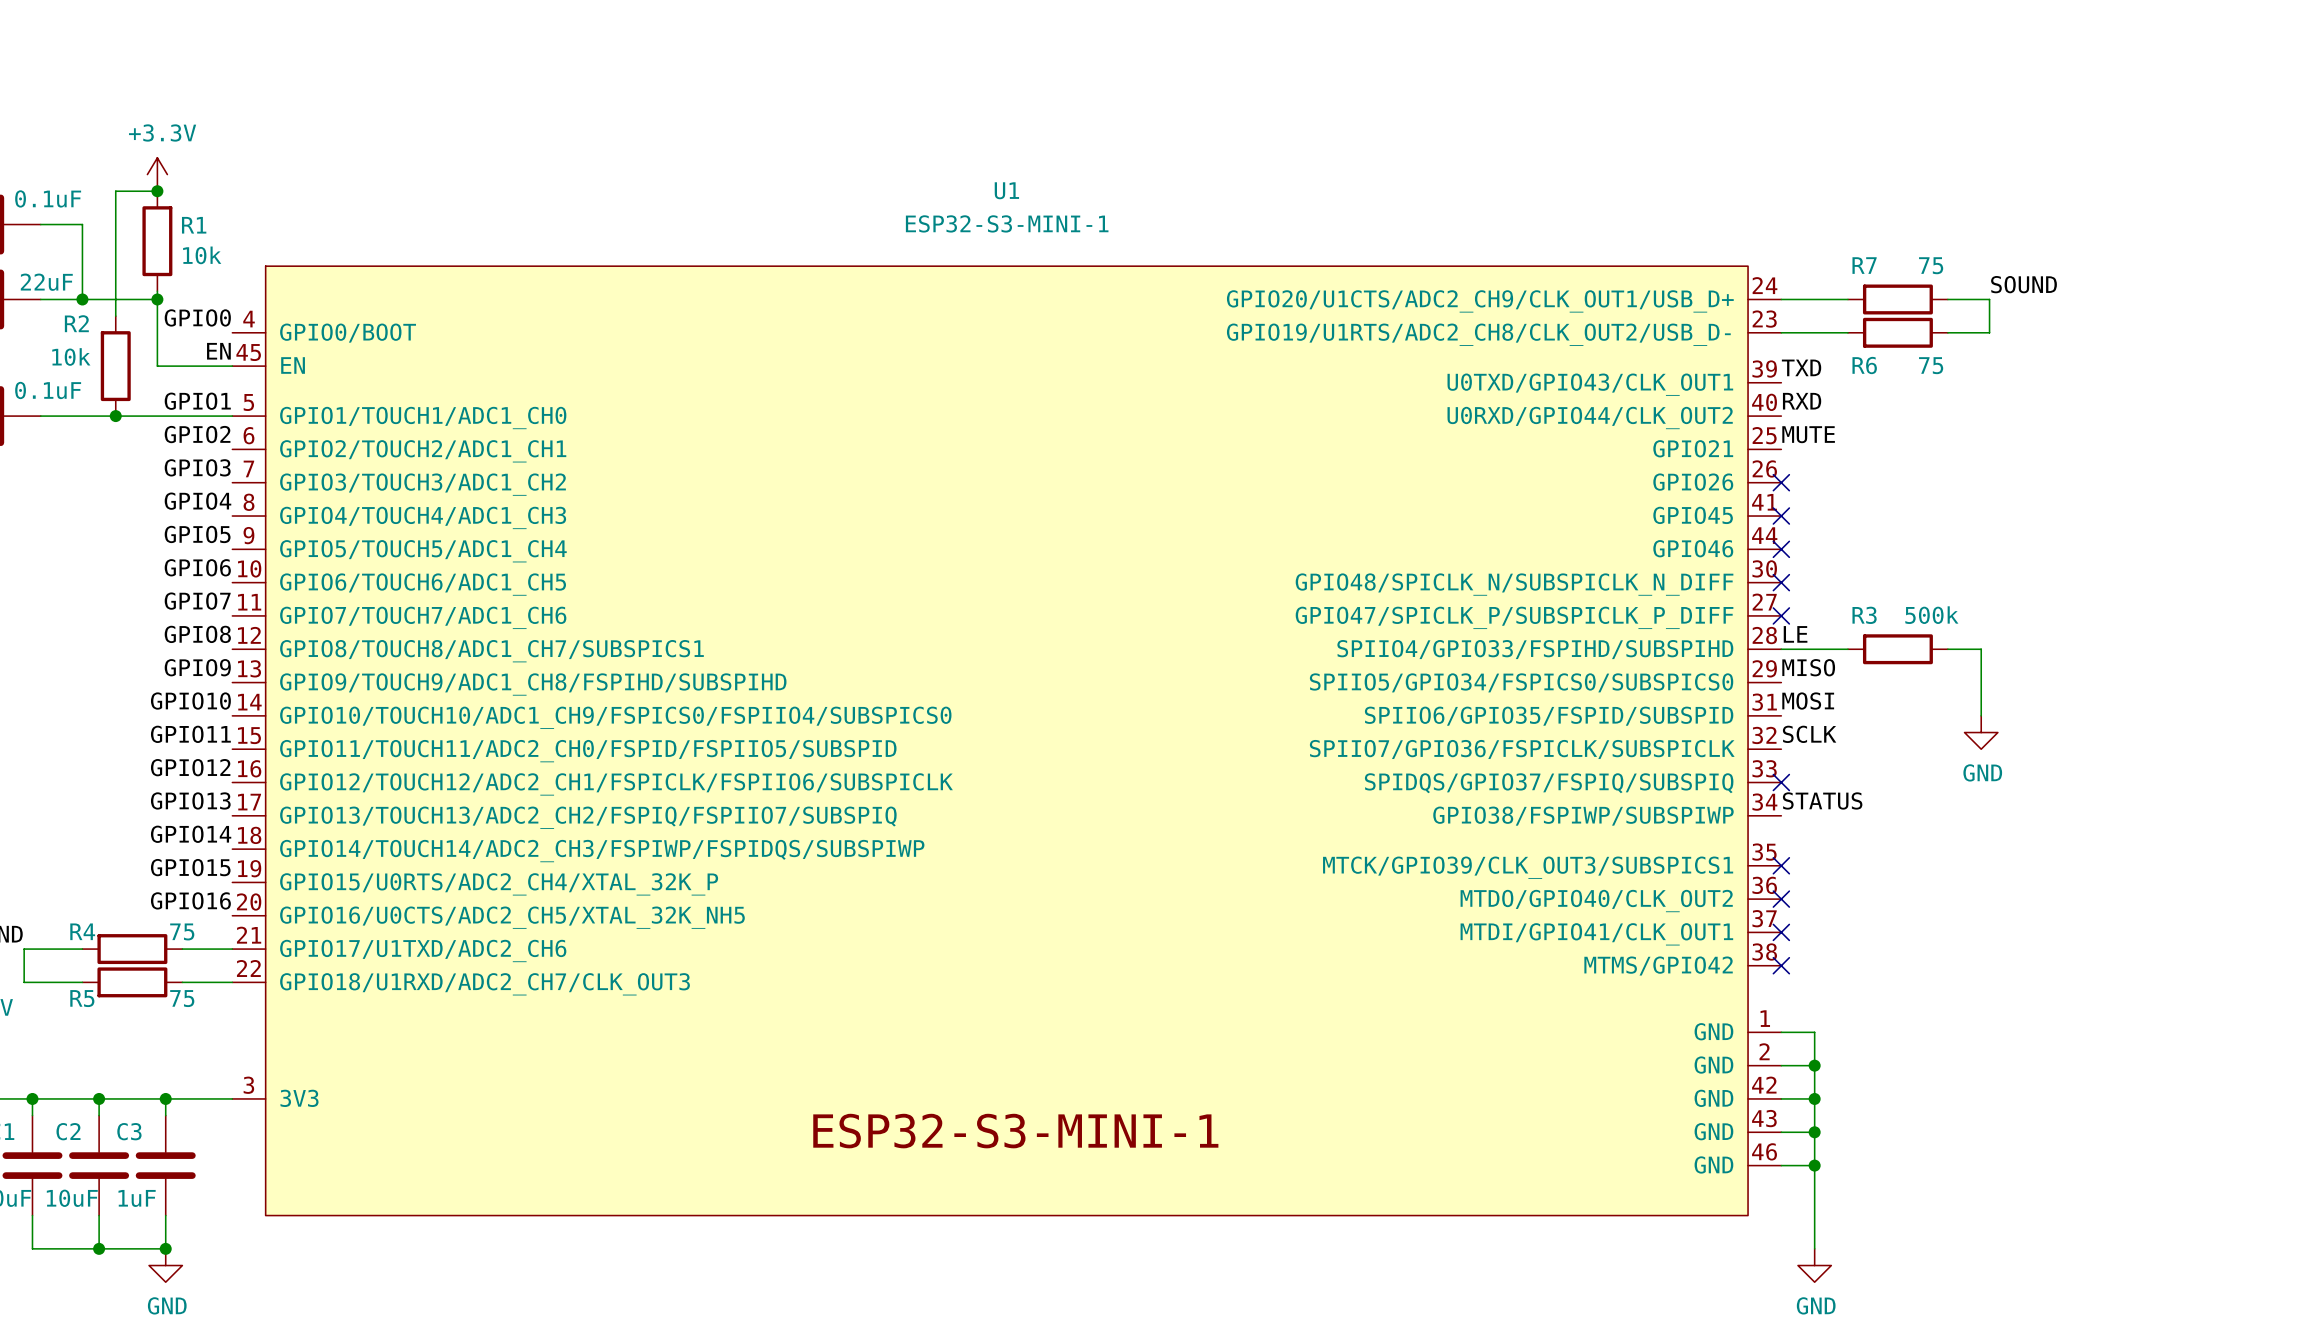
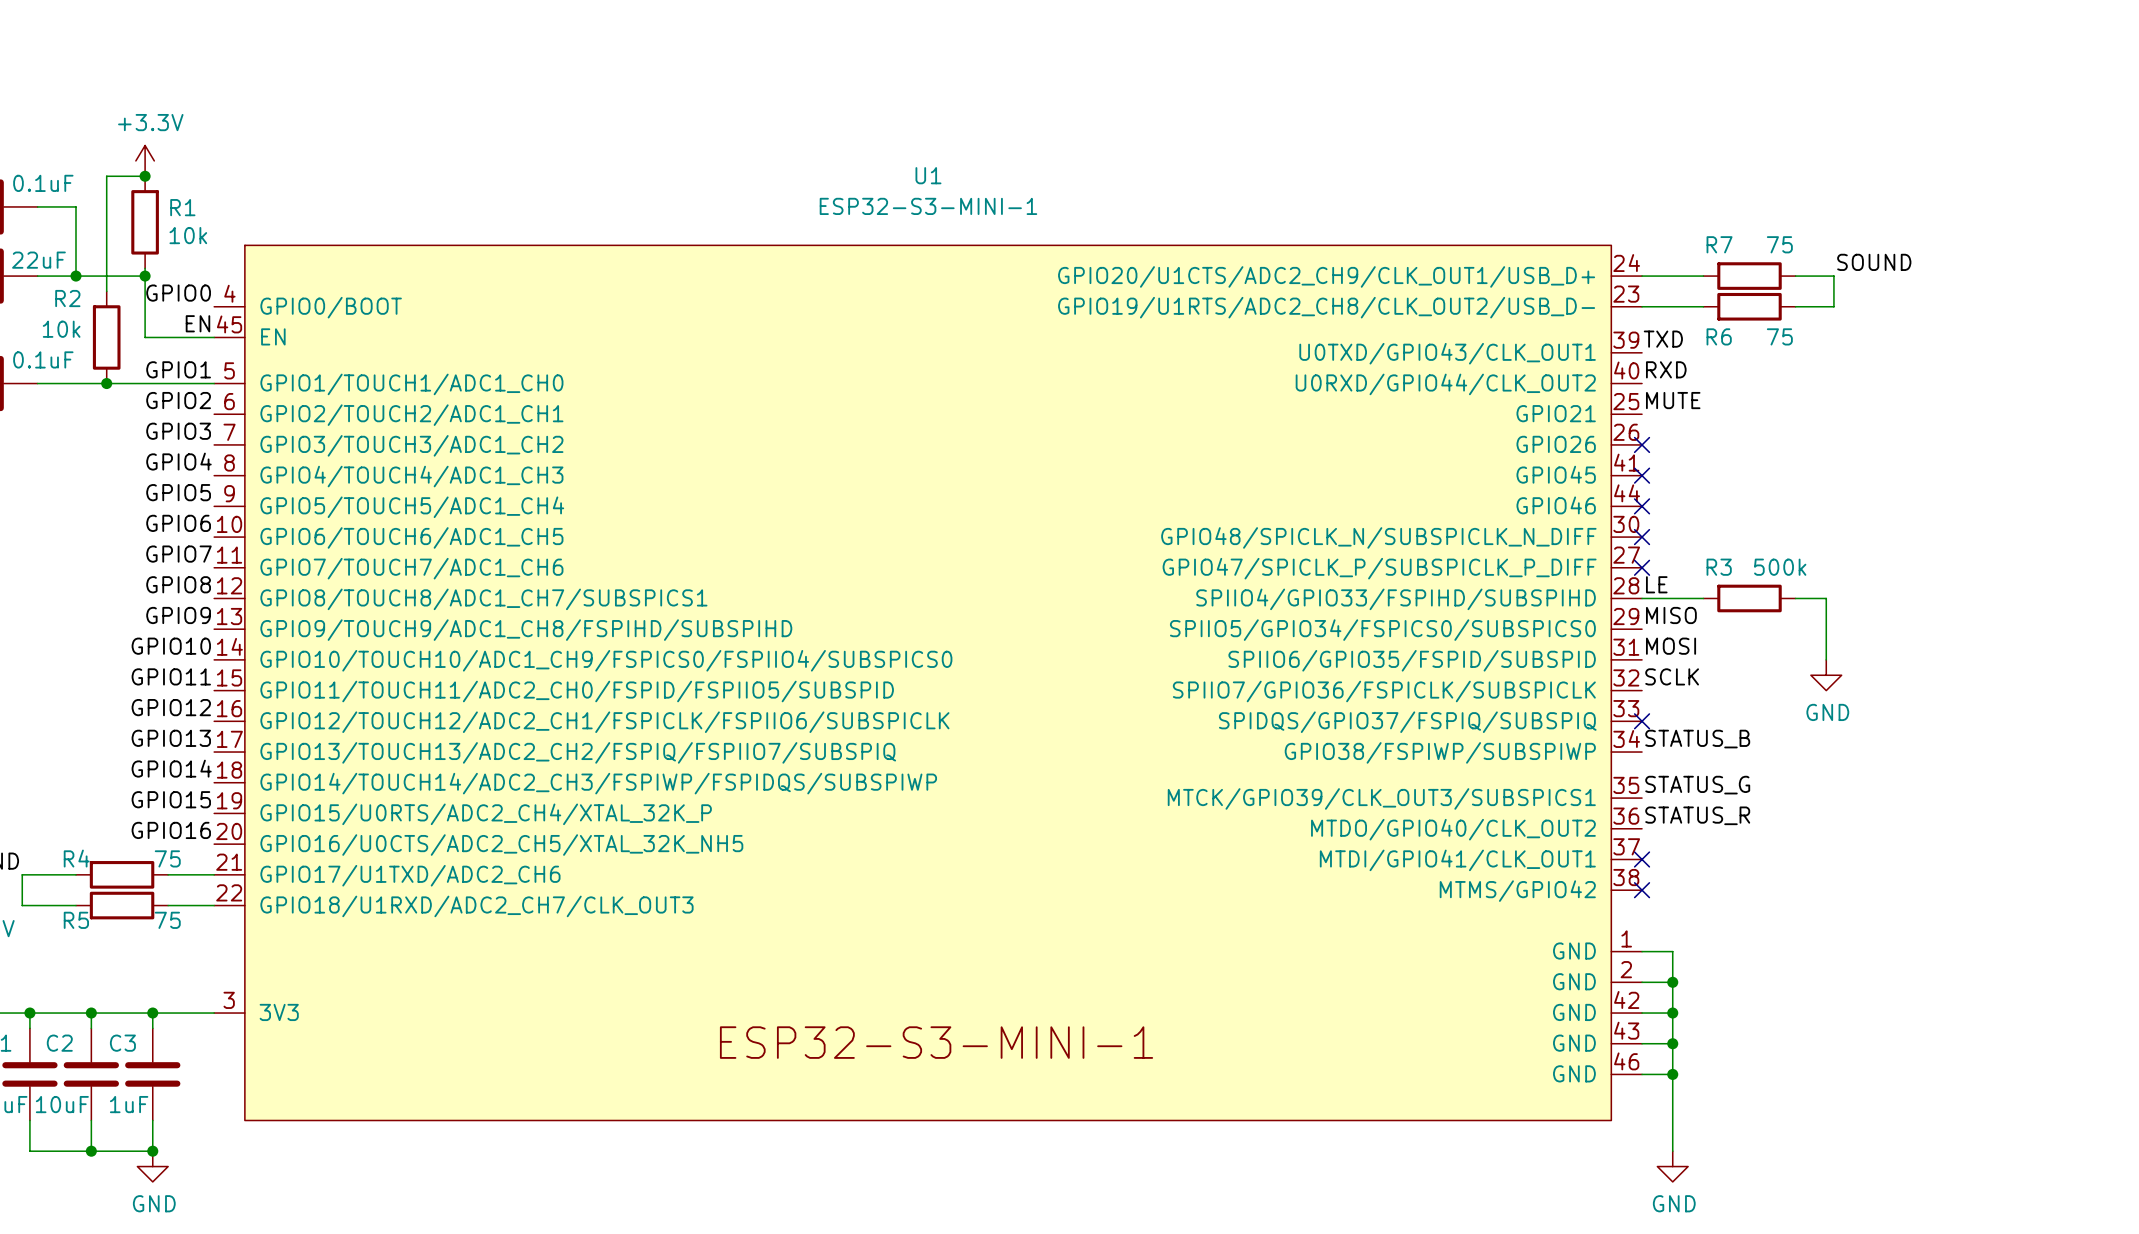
label: STATUS (1822, 800) -> STATUS_B (1697, 739)
label: none -> STATUS_G (1697, 785)
no-connect mark: (1781, 865) -> none
label: none -> STATUS_R (1697, 815)
no-connect mark: (1781, 899) -> none

